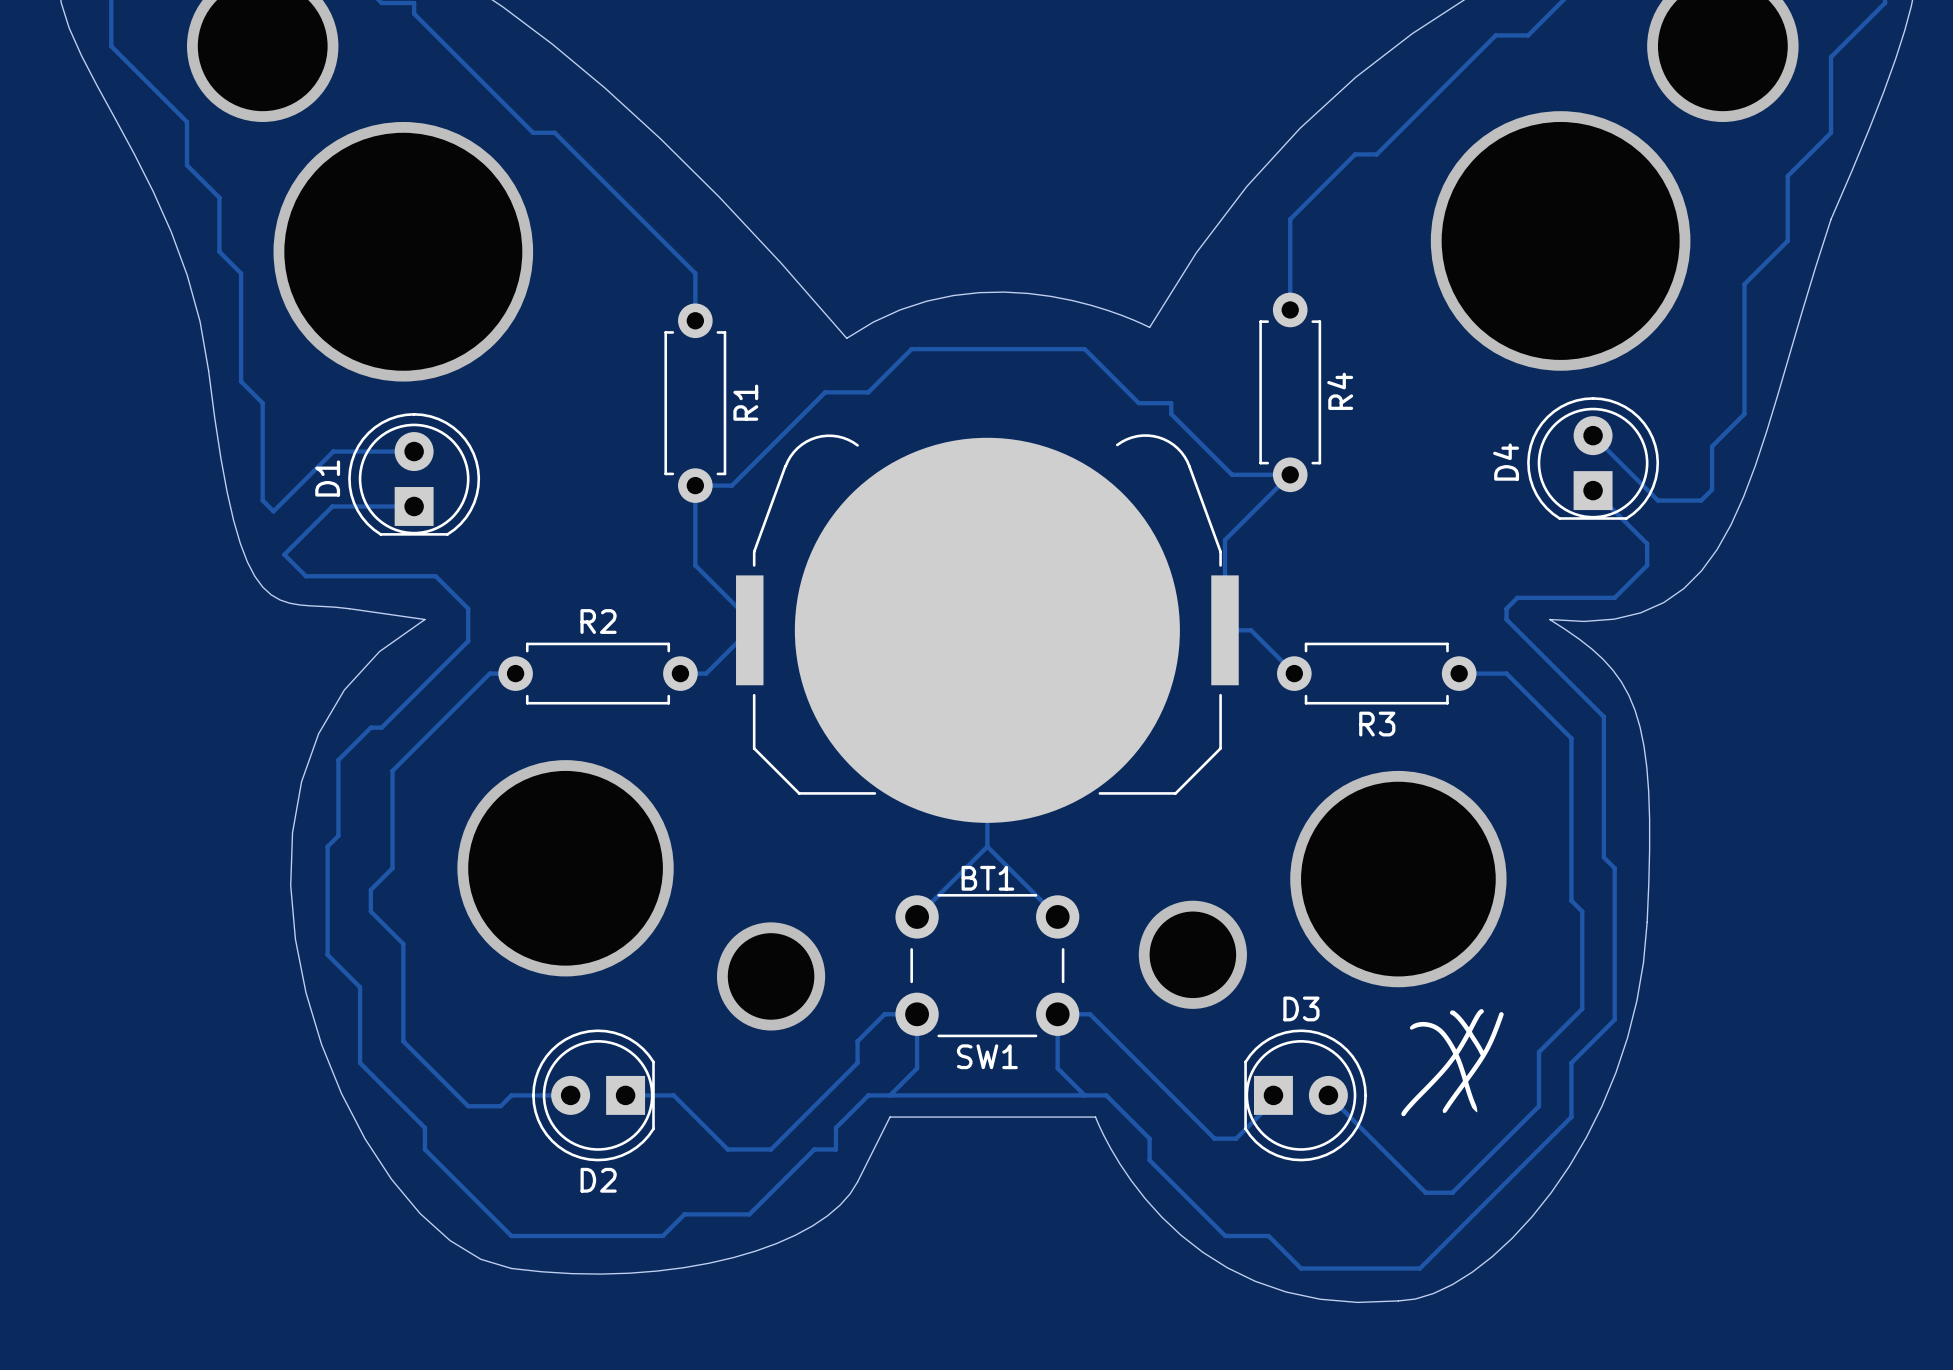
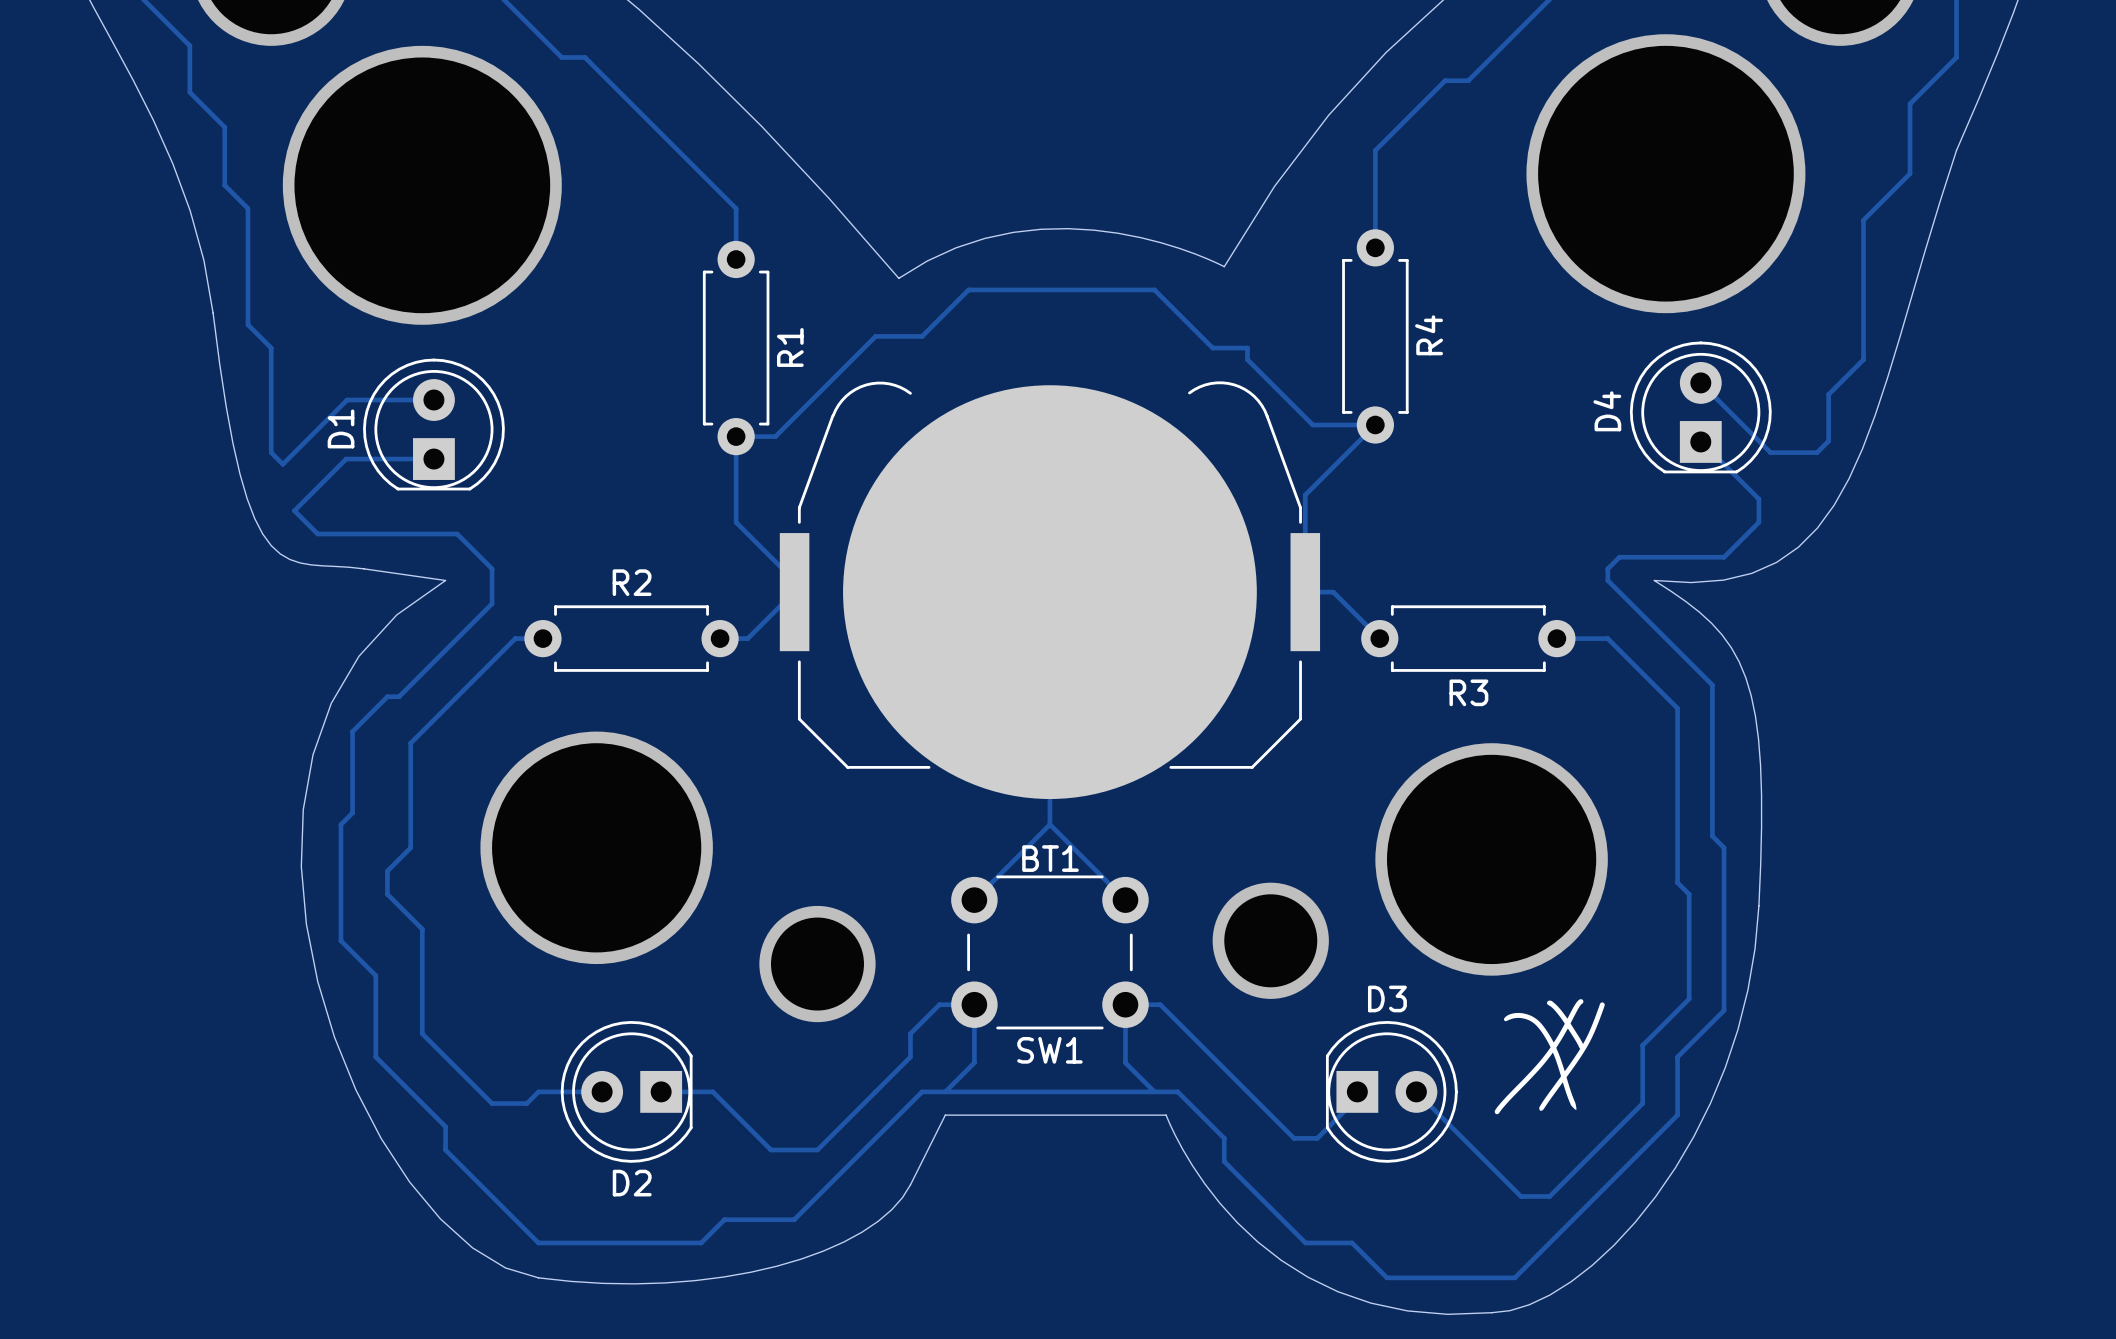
track: (835, 1127) (835, 1149) (814, 1149) -> (887, 1126) (863, 1150)

